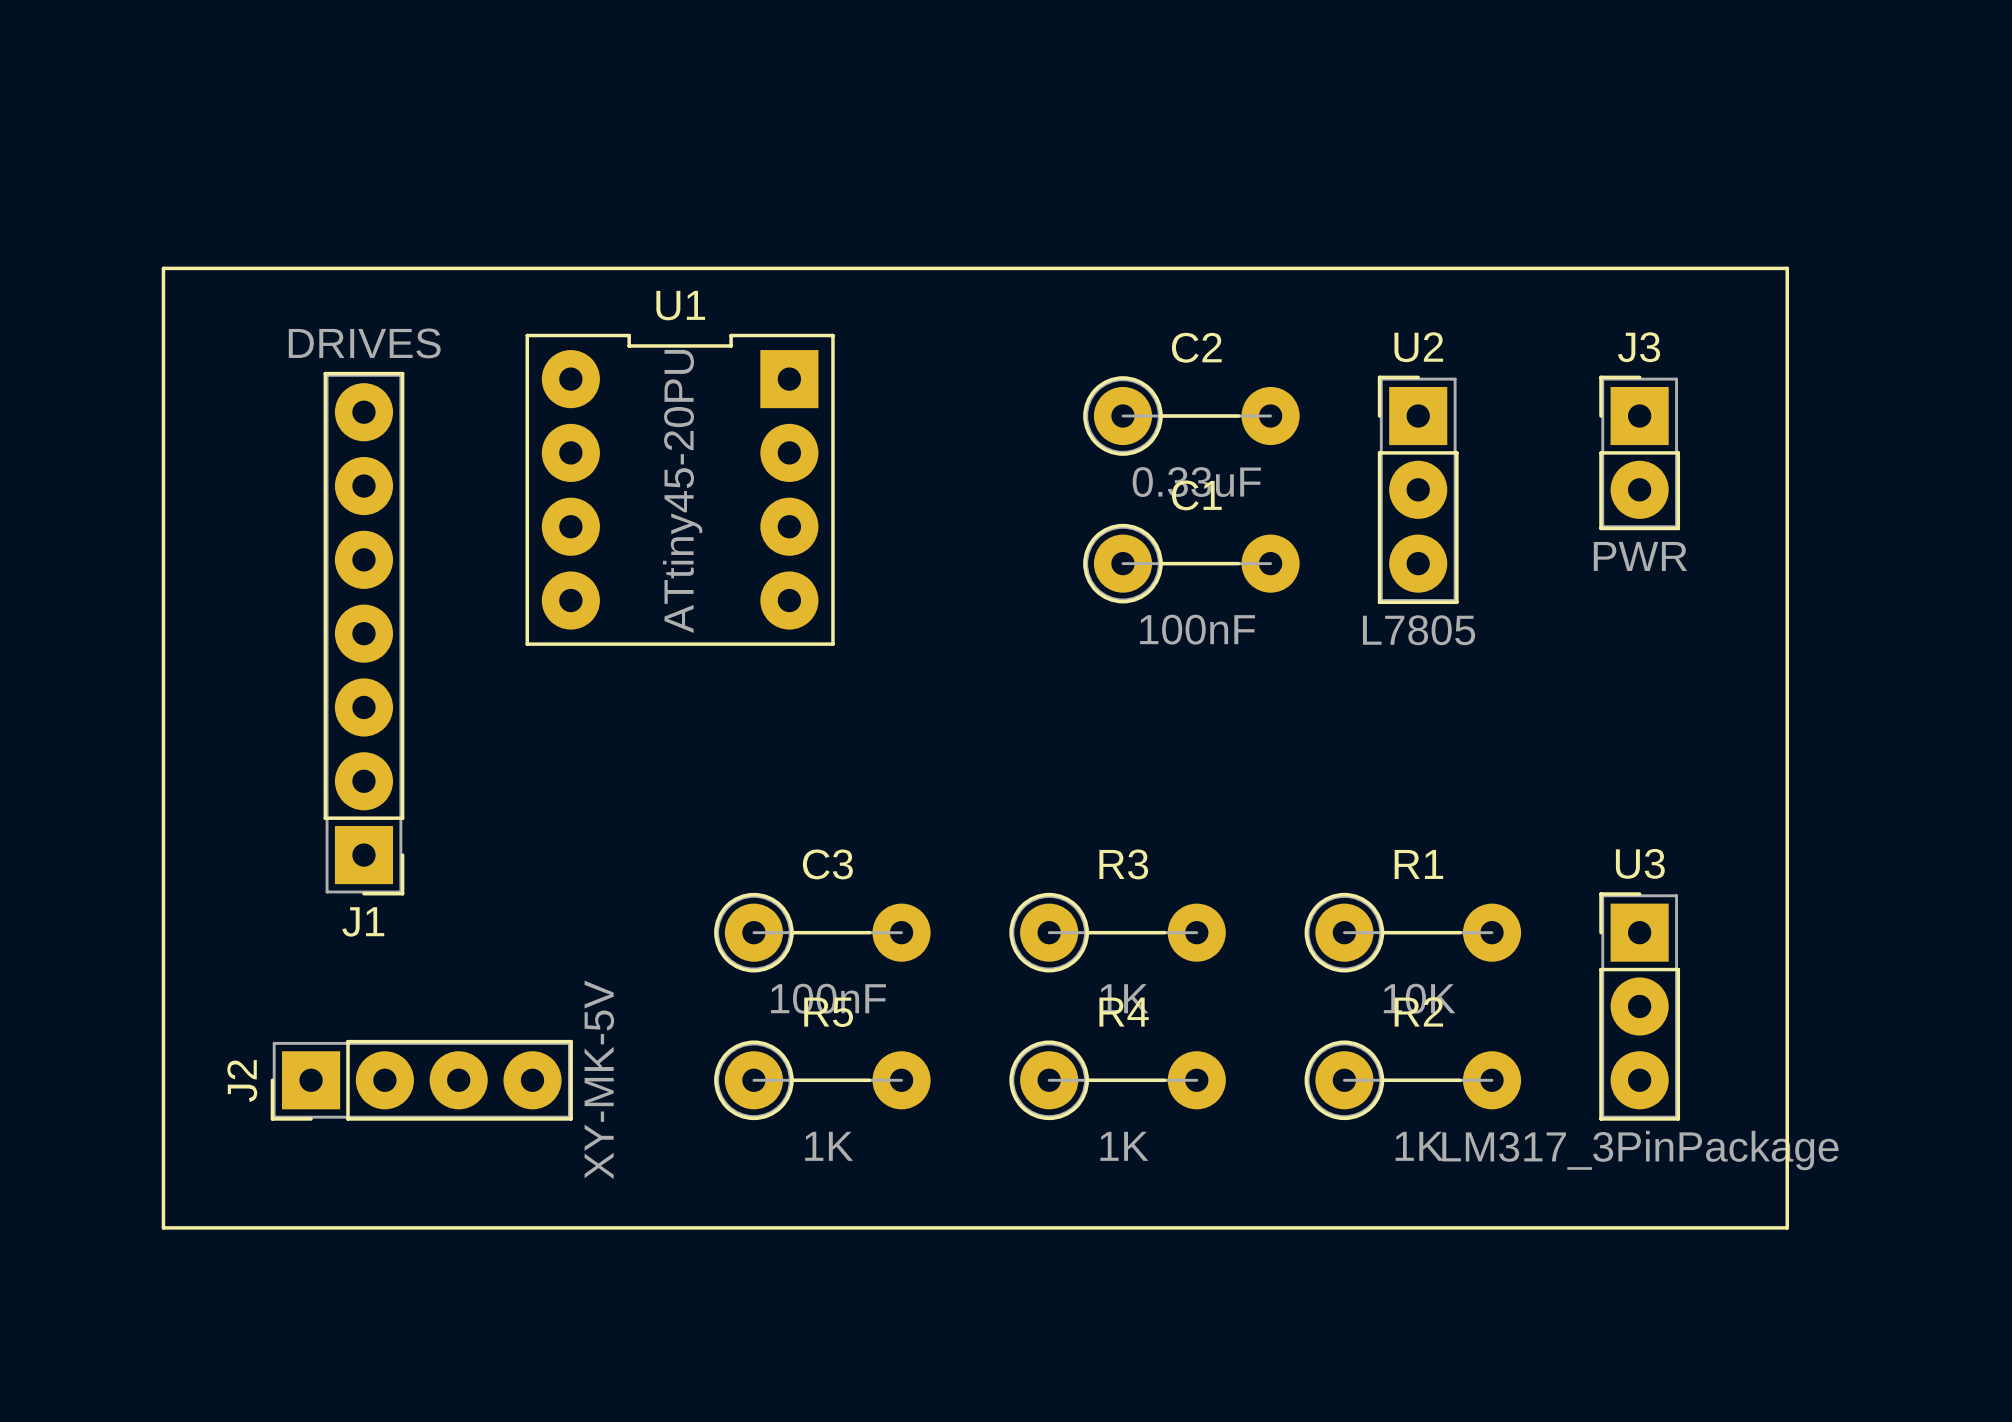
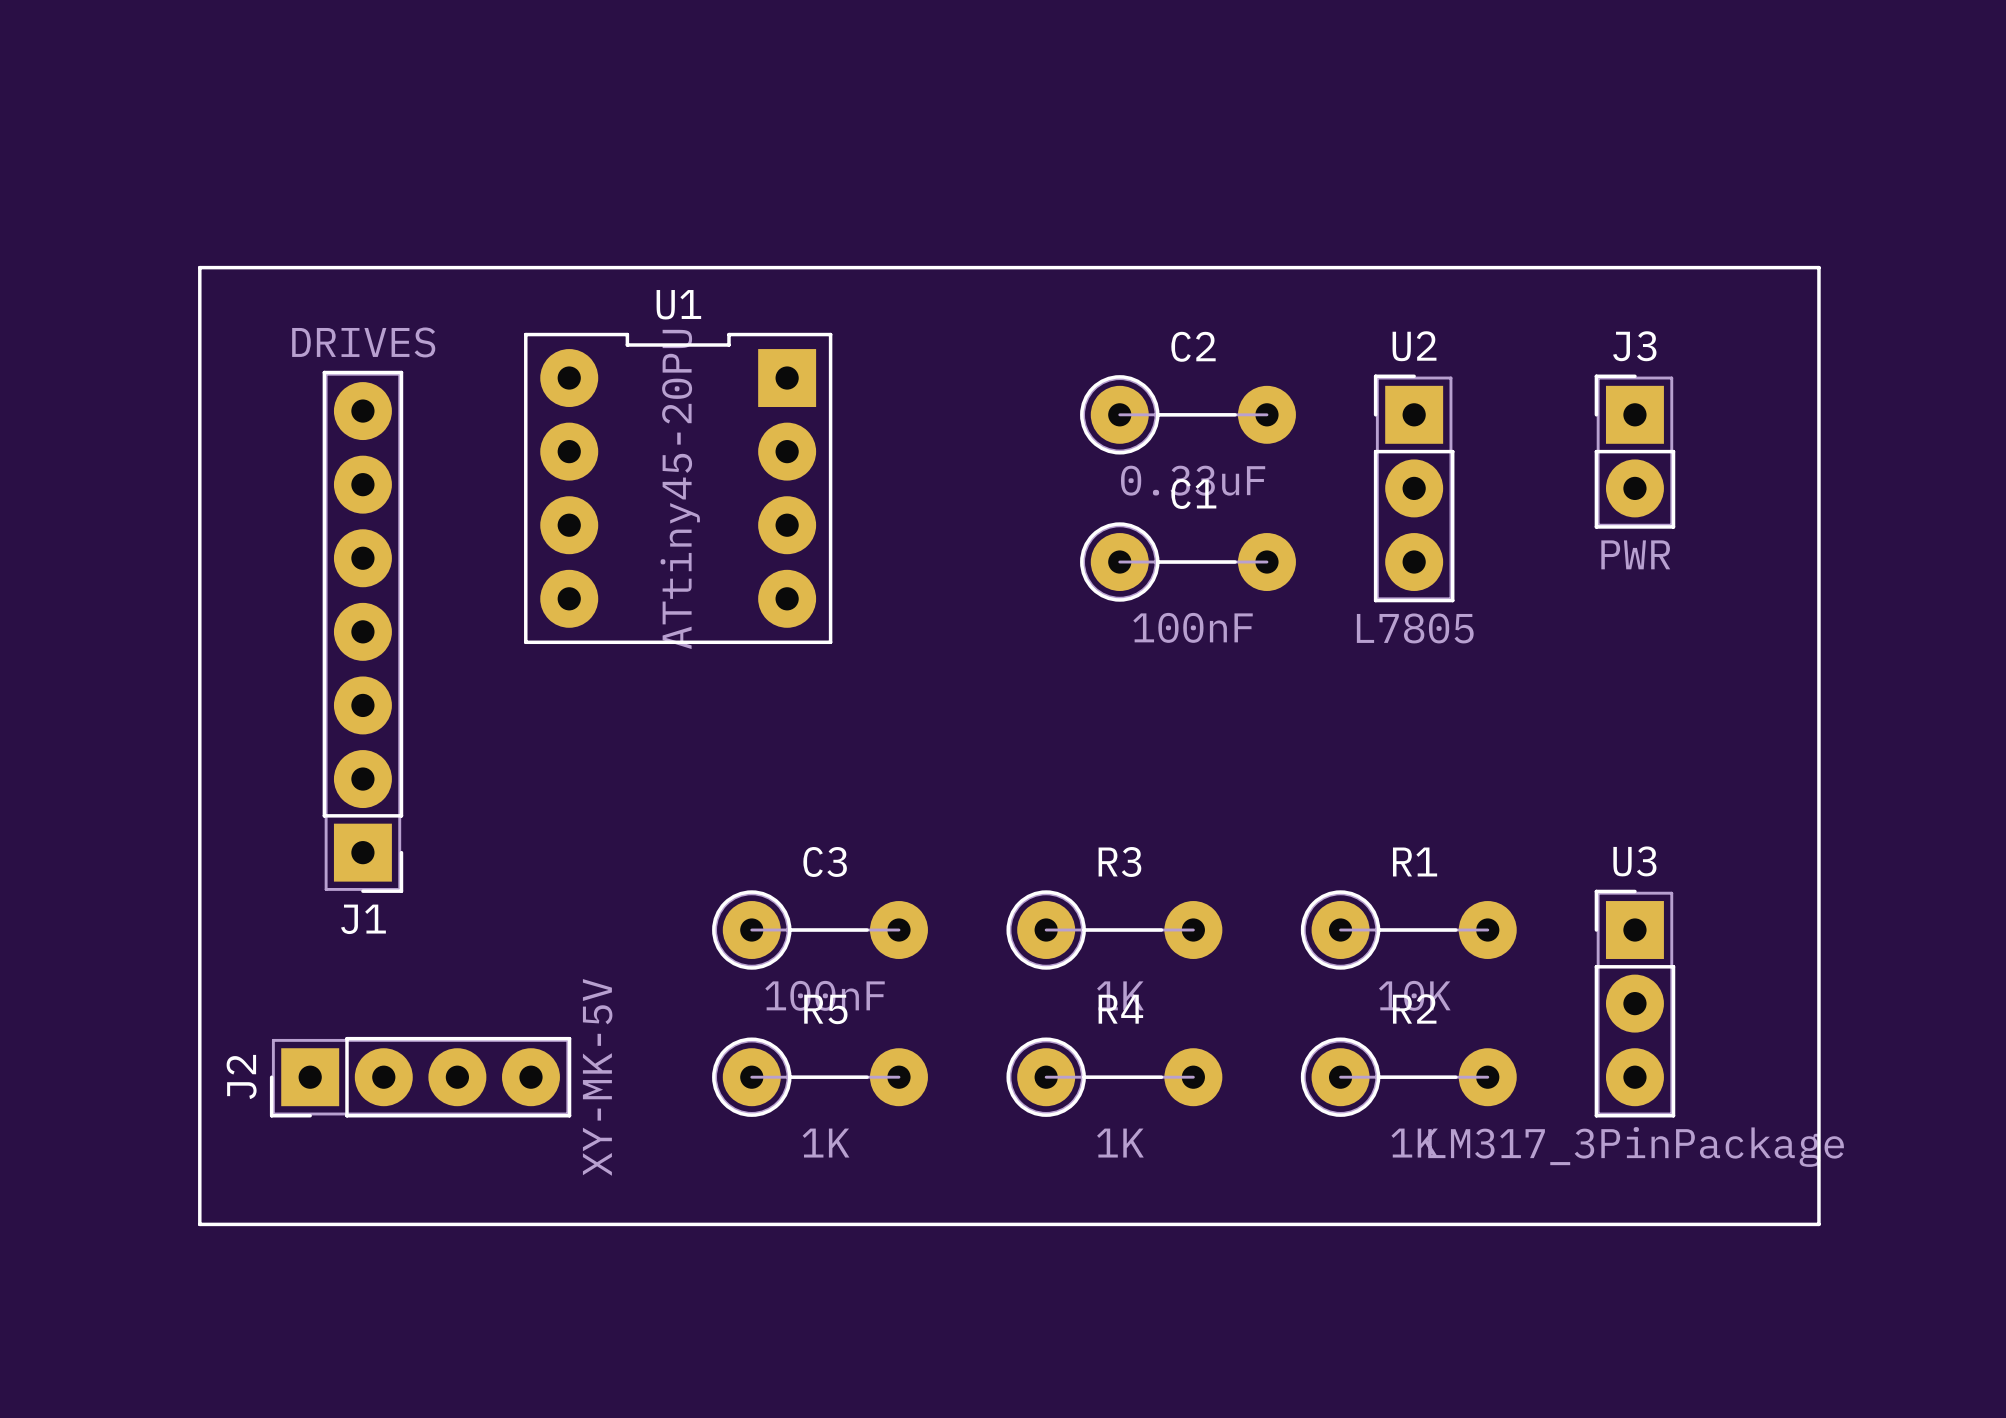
line: (200, 268) (163, 268) (163, 1227) (200, 1227) -> (199, 267) (199, 1224)
line: (1787, 268) (1787, 1227) -> (1782, 267) (1818, 267) (1818, 1224) (1782, 1224)

